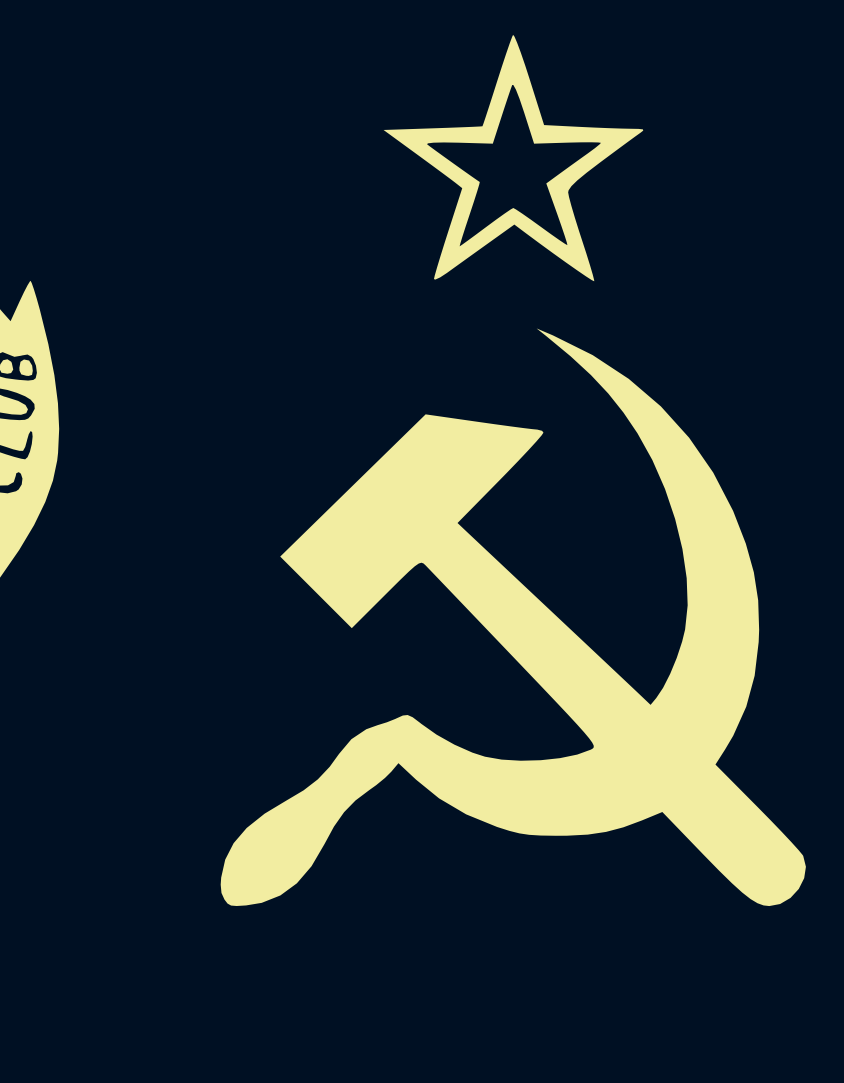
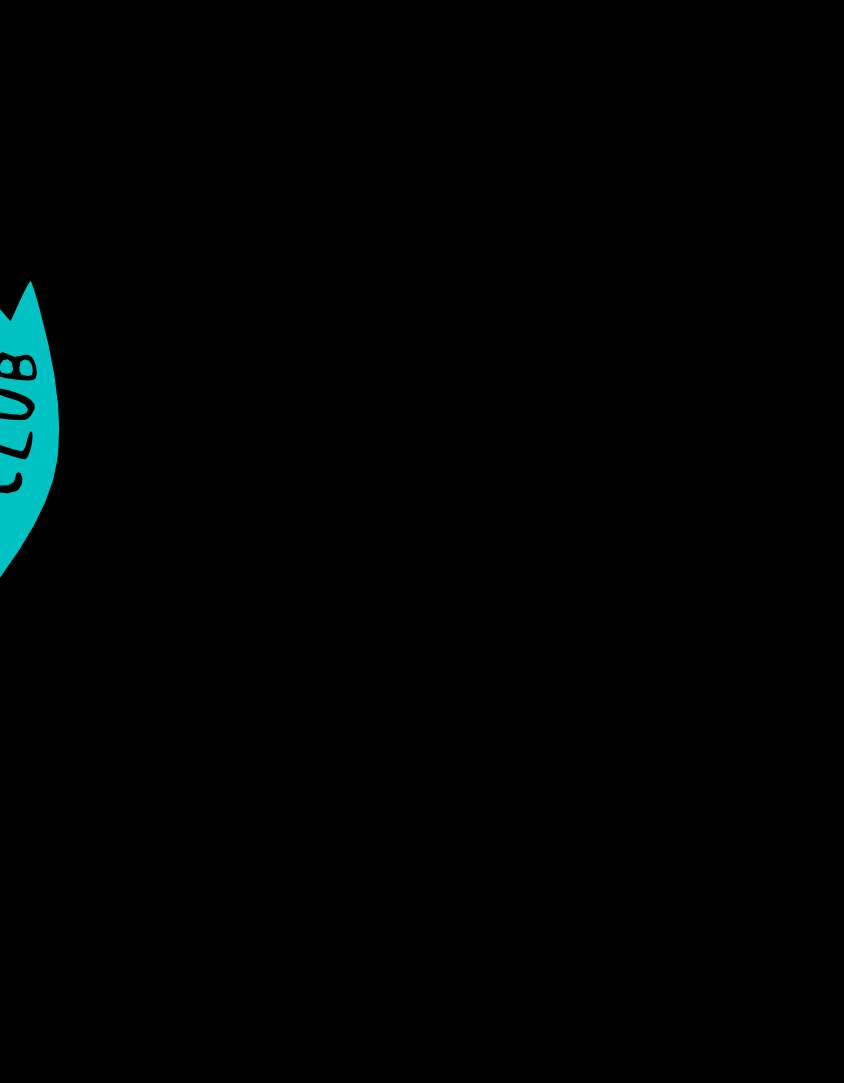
drawing: [220, 34, 806, 907] -> none

